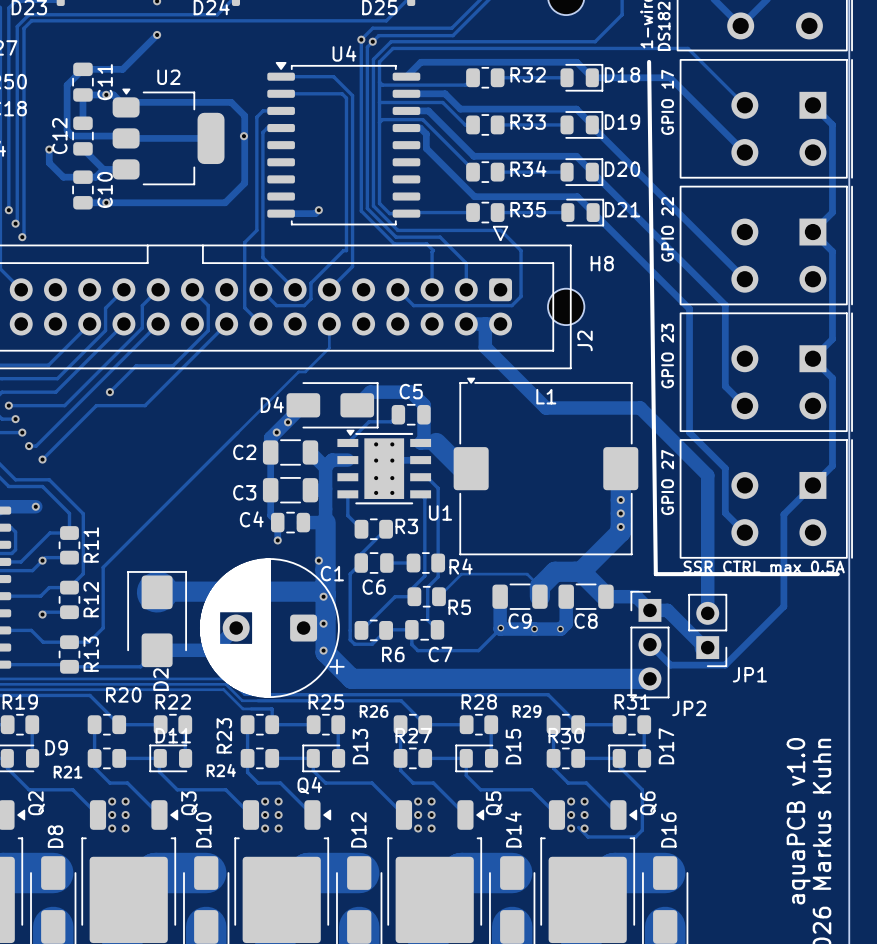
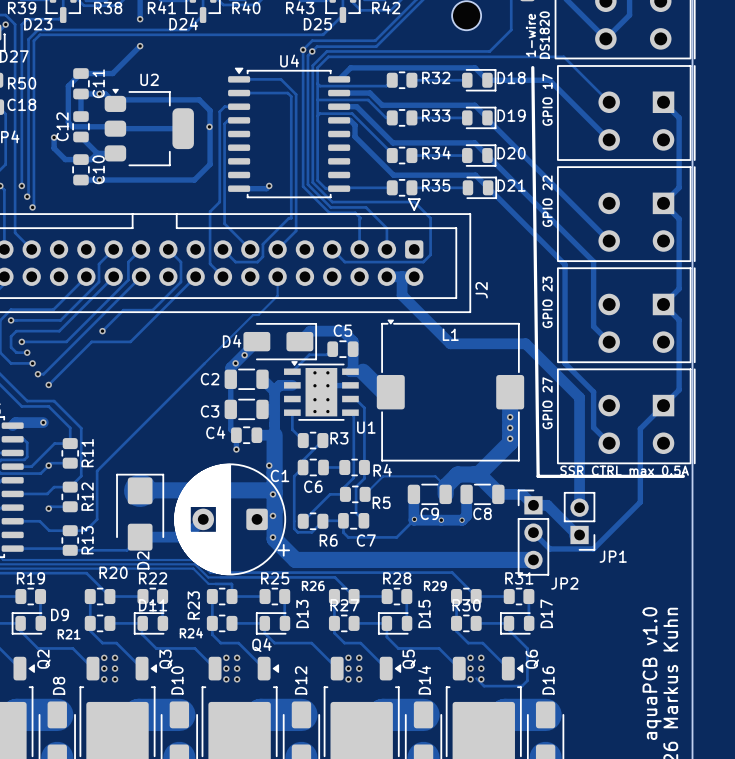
H8: (566, 306) -> none

